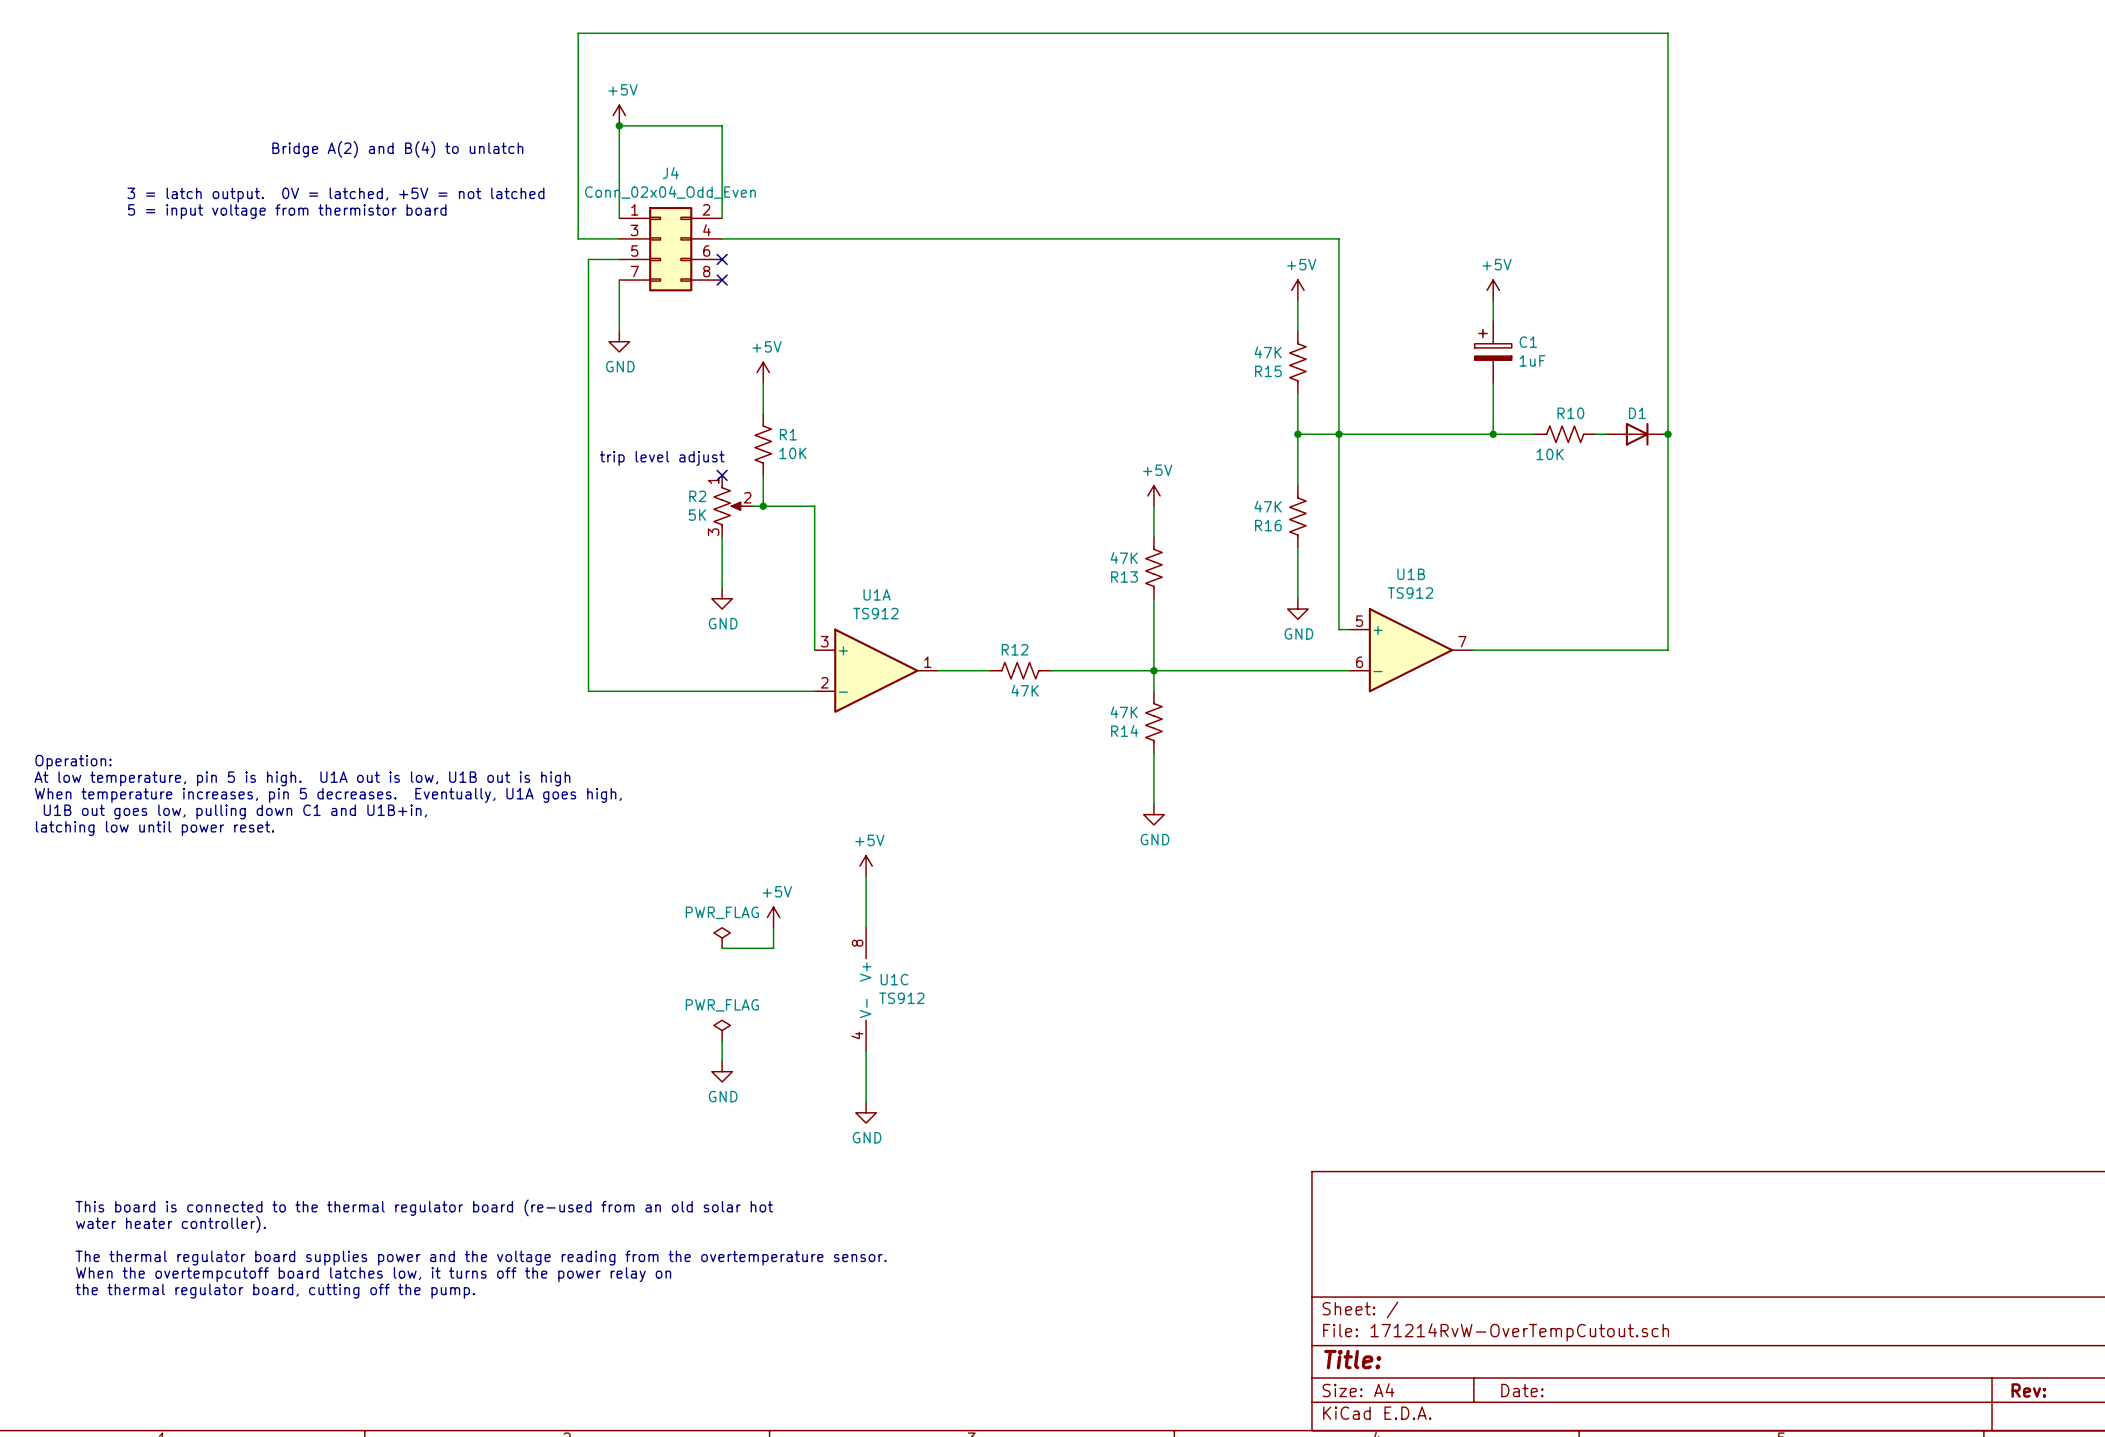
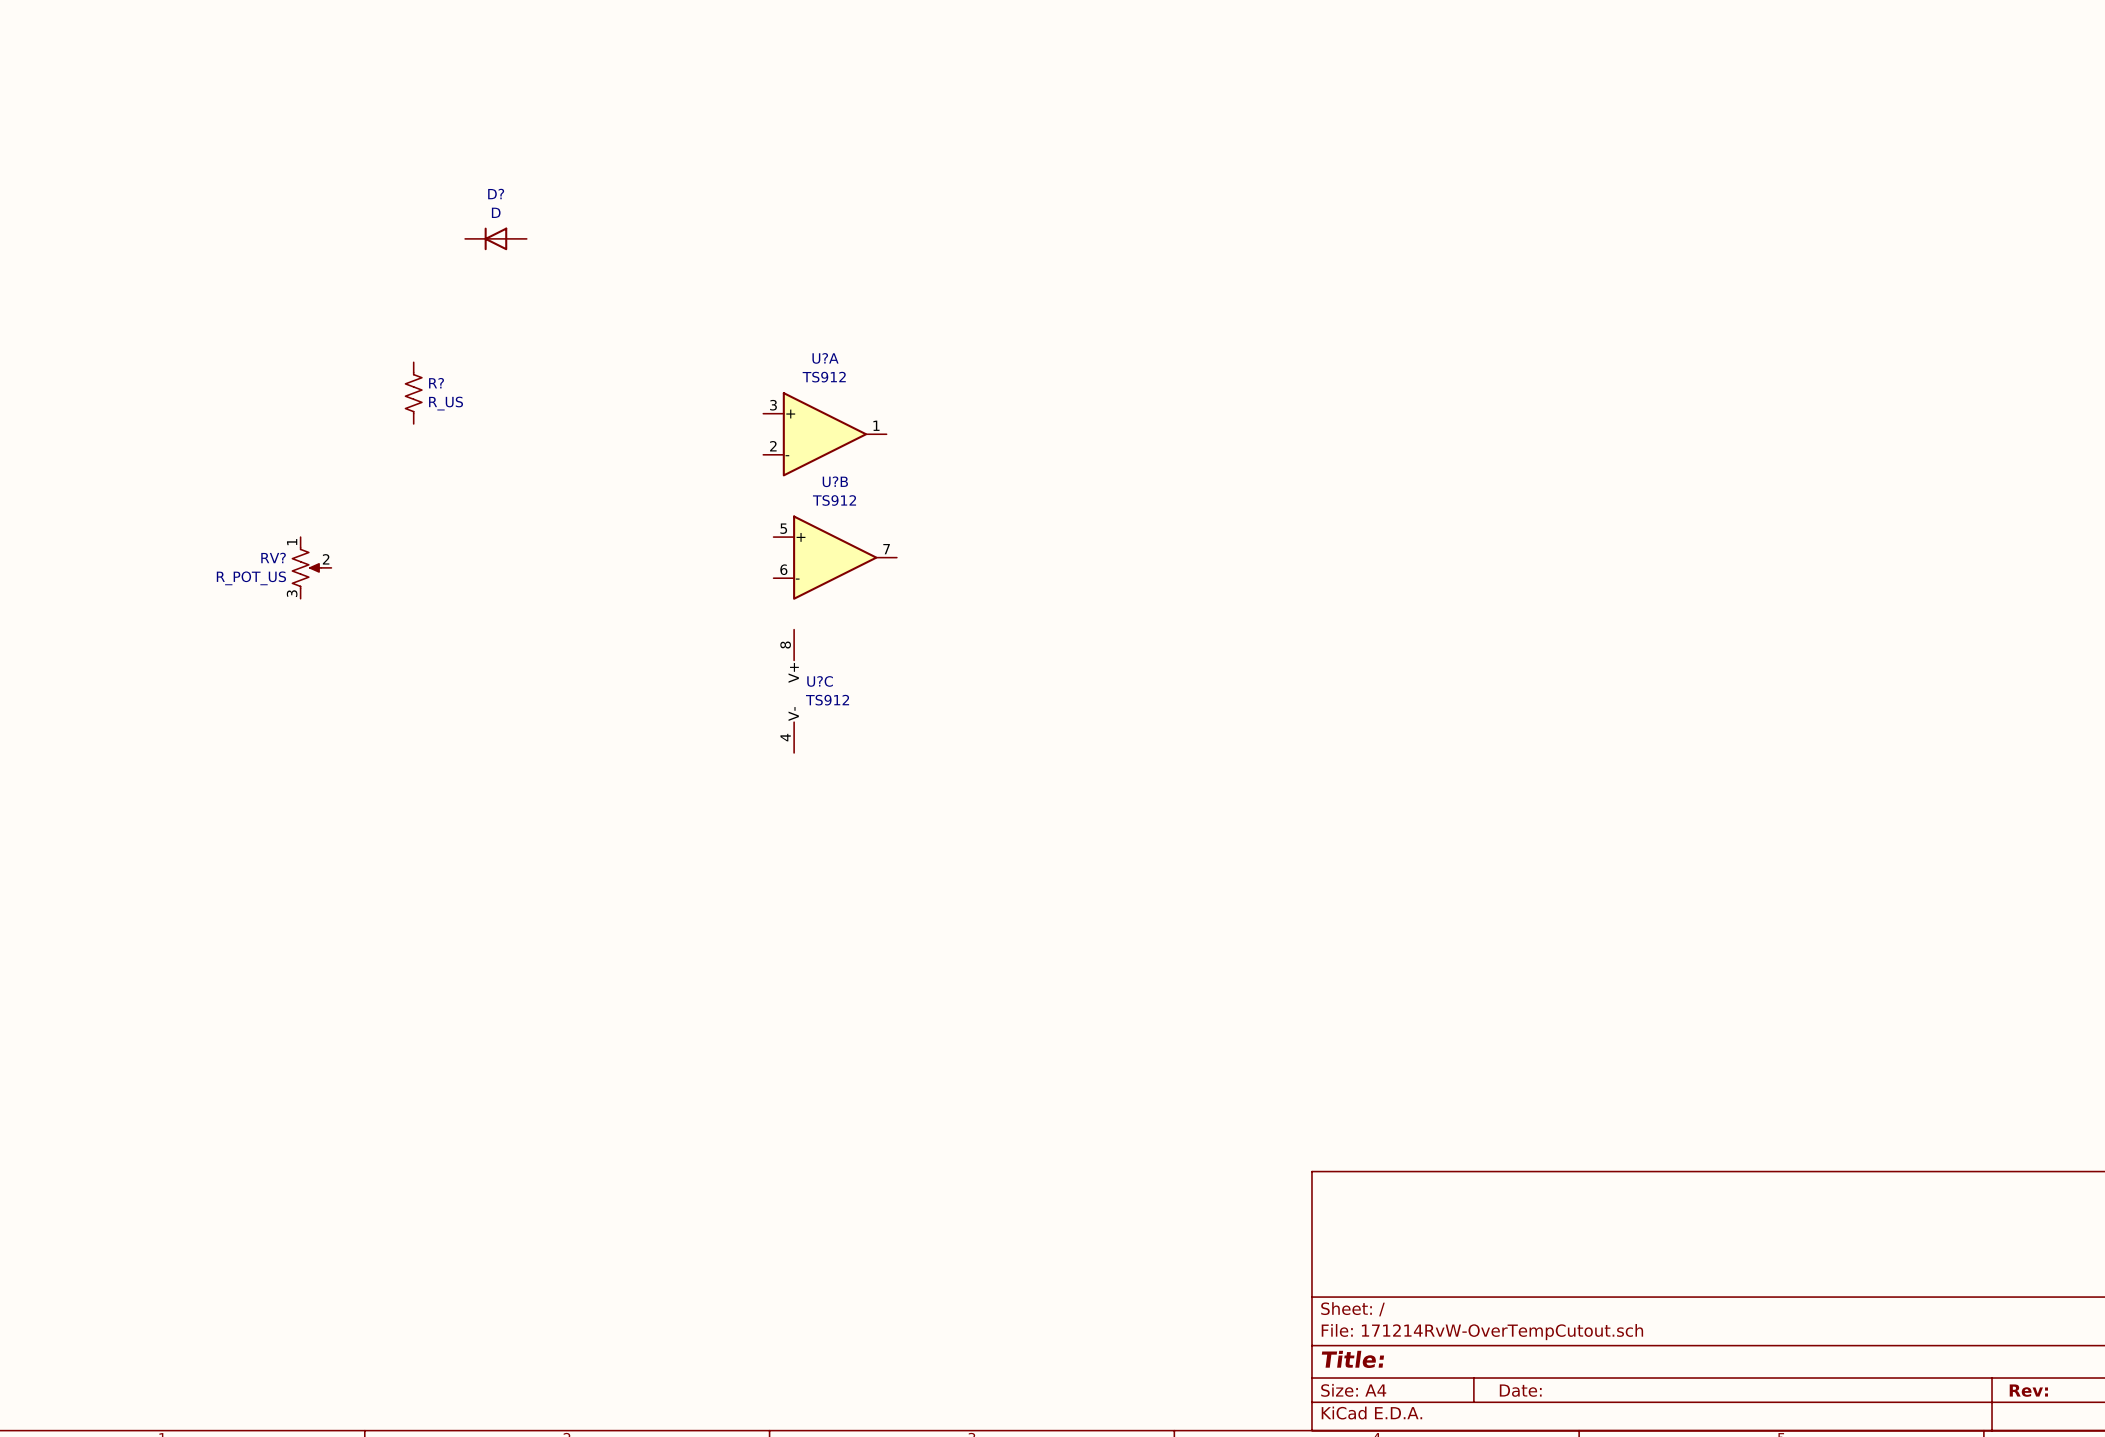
power symbol: +5V (619, 115) -> none
junction: (619, 125) -> none
text: Bridge A(2) and B(4) to unlatch (397, 149) -> none
text: 3 = latch output. 0V = latched, +5V = not latched (335, 195) -> none
text: 5 = input voltage from thermistor board (287, 211) -> none
wire: (619, 218) (619, 125) (722, 125) (722, 218) -> none
D?: none -> D (495, 238)
wire: (619, 238) (578, 238) (578, 33) (1668, 33) (1668, 650) (1472, 650) -> none
wire: (722, 238) (1339, 238) (1339, 629) (1349, 629) -> none
J4: Conn_02x04_Odd_Even (670, 249) -> none
wire: (619, 259) (588, 259) (588, 691) (814, 691) -> none
no-connect mark: (722, 259) -> none
wire: (619, 280) (619, 331) -> none
no-connect mark: (722, 280) -> none
power symbol: +5V (1297, 290) -> none
power symbol: +5V (1493, 290) -> none
wire: (1297, 300) (1297, 331) -> none
wire: (1493, 300) (1493, 321) -> none
power symbol: GND (619, 341) -> none
C1: 1uF (1493, 352) -> none
R15: 47K (1297, 362) -> none
power symbol: +5V (763, 372) -> none
wire: (763, 382) (763, 413) -> none
wire: (1493, 382) (1493, 434) -> none
R?: none -> R_US (413, 393)
wire: (1297, 393) (1297, 485) -> none
U?A: none -> TS912 (824, 434)
wire: (1297, 434) (1534, 434) -> none
junction: (1297, 434) -> none
junction: (1339, 434) -> none
junction: (1493, 434) -> none
R10: 10K (1565, 434) -> none
wire: (1596, 434) (1606, 434) -> none
D1: (1637, 434) -> none
junction: (1668, 434) -> none
R1: 10K (763, 444) -> none
text: trip level adjust (662, 458) -> none
no-connect mark: (722, 475) -> none
wire: (763, 475) (763, 506) -> none
power symbol: +5V (1153, 495) -> none
R2: 5K (733, 506) -> none
wire: (752, 506) (814, 506) (814, 650) -> none
junction: (763, 506) -> none
wire: (1153, 506) (1153, 537) -> none
R16: 47K (1297, 516) -> none
wire: (722, 537) (722, 588) -> none
wire: (1297, 547) (1297, 598) -> none
U?B: none -> TS912 (835, 557)
RV?: none -> R_POT_US (311, 567)
R13: 47K (1153, 567) -> none
power symbol: GND (722, 598) -> none
wire: (1153, 598) (1153, 691) -> none
power symbol: GND (1297, 609) -> none
U1B: TS912 (1410, 650) -> none
U1A: TS912 (876, 670) -> none
wire: (938, 670) (989, 670) -> none
R12: 47K (1020, 670) -> none
wire: (1051, 670) (1349, 670) -> none
junction: (1153, 670) -> none
U?C: none -> TS912 (794, 691)
R14: 47K (1153, 722) -> none
wire: (1153, 752) (1153, 804) -> none
text: Operation: (73, 762) -> none
text: At low temperature, pin 5 is high. U1A out is low, U1B out is high (302, 778) -> none
text: When temperature increases, pin 5 decreases. Eventually, U1A goes high, (328, 795) -> none
text: U1B out goes low, pulling down C1 and U1B+in, (235, 811) -> none
power symbol: GND (1153, 814) -> none
text: latching low until power reset. (155, 828) -> none
power symbol: +5V (866, 866) -> none
wire: (866, 876) (866, 927) -> none
power symbol: +5V (773, 917) -> none
wire: (773, 927) (773, 948) (722, 948) -> none
power symbol: PWR_FLAG (722, 938) -> none
U1C: TS912 (866, 989) -> none
power symbol: PWR_FLAG (722, 1030) -> none
wire: (722, 1040) (722, 1061) -> none
wire: (866, 1051) (866, 1102) -> none
power symbol: GND (722, 1071) -> none
power symbol: GND (866, 1112) -> none
text: This board is connected to the thermal regulator board (re-used from an old solar hot (424, 1207) -> none
text: water heater controller). (170, 1224) -> none
text: The thermal regulator board supplies power and the voltage reading from the overtemperature sensor. (481, 1258) -> none
text: When the overtempcutoff board latches low, it turns off the power relay on (373, 1274) -> none
text: the thermal regulator board, cutting off the pump. (275, 1291) -> none

